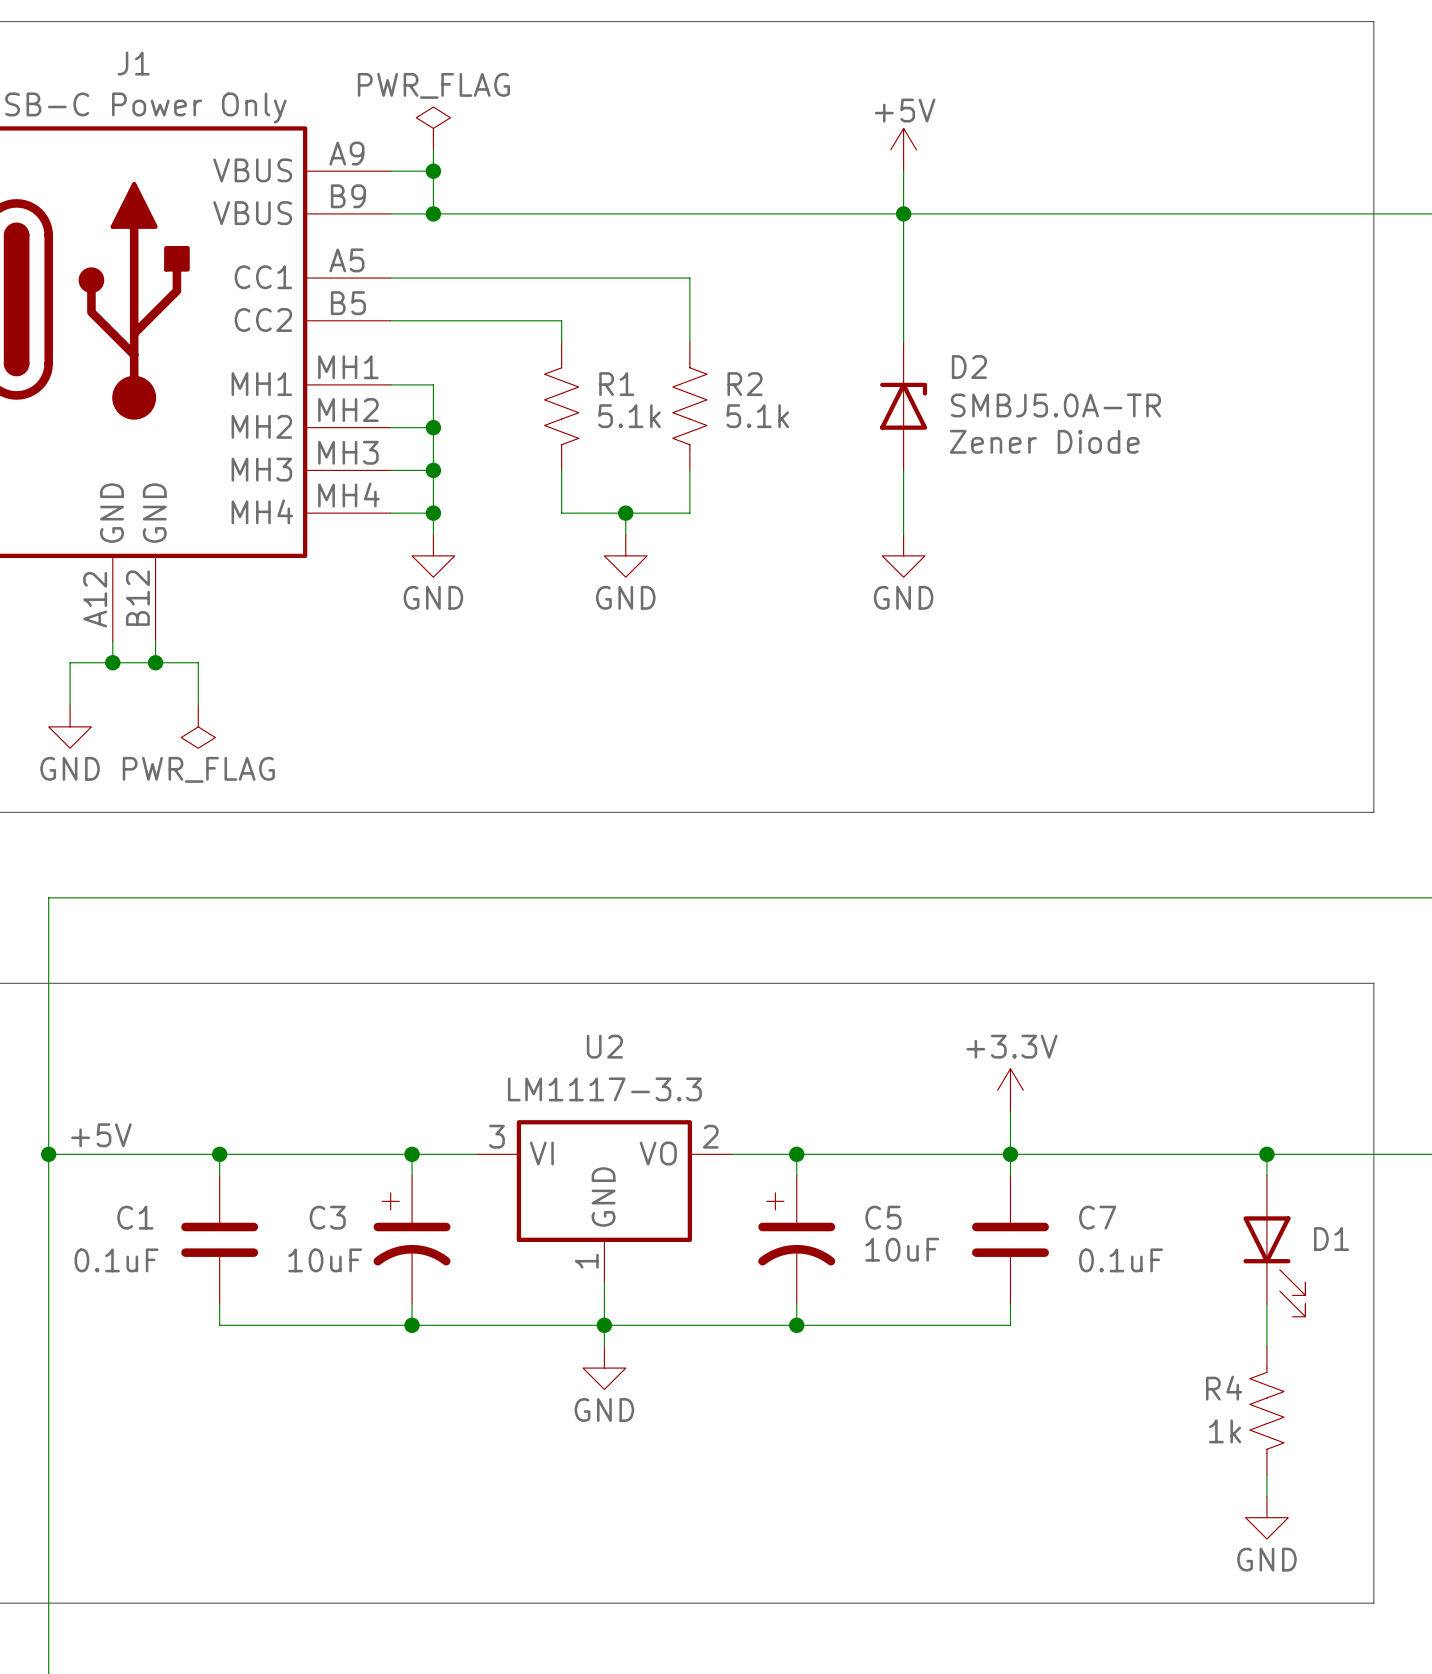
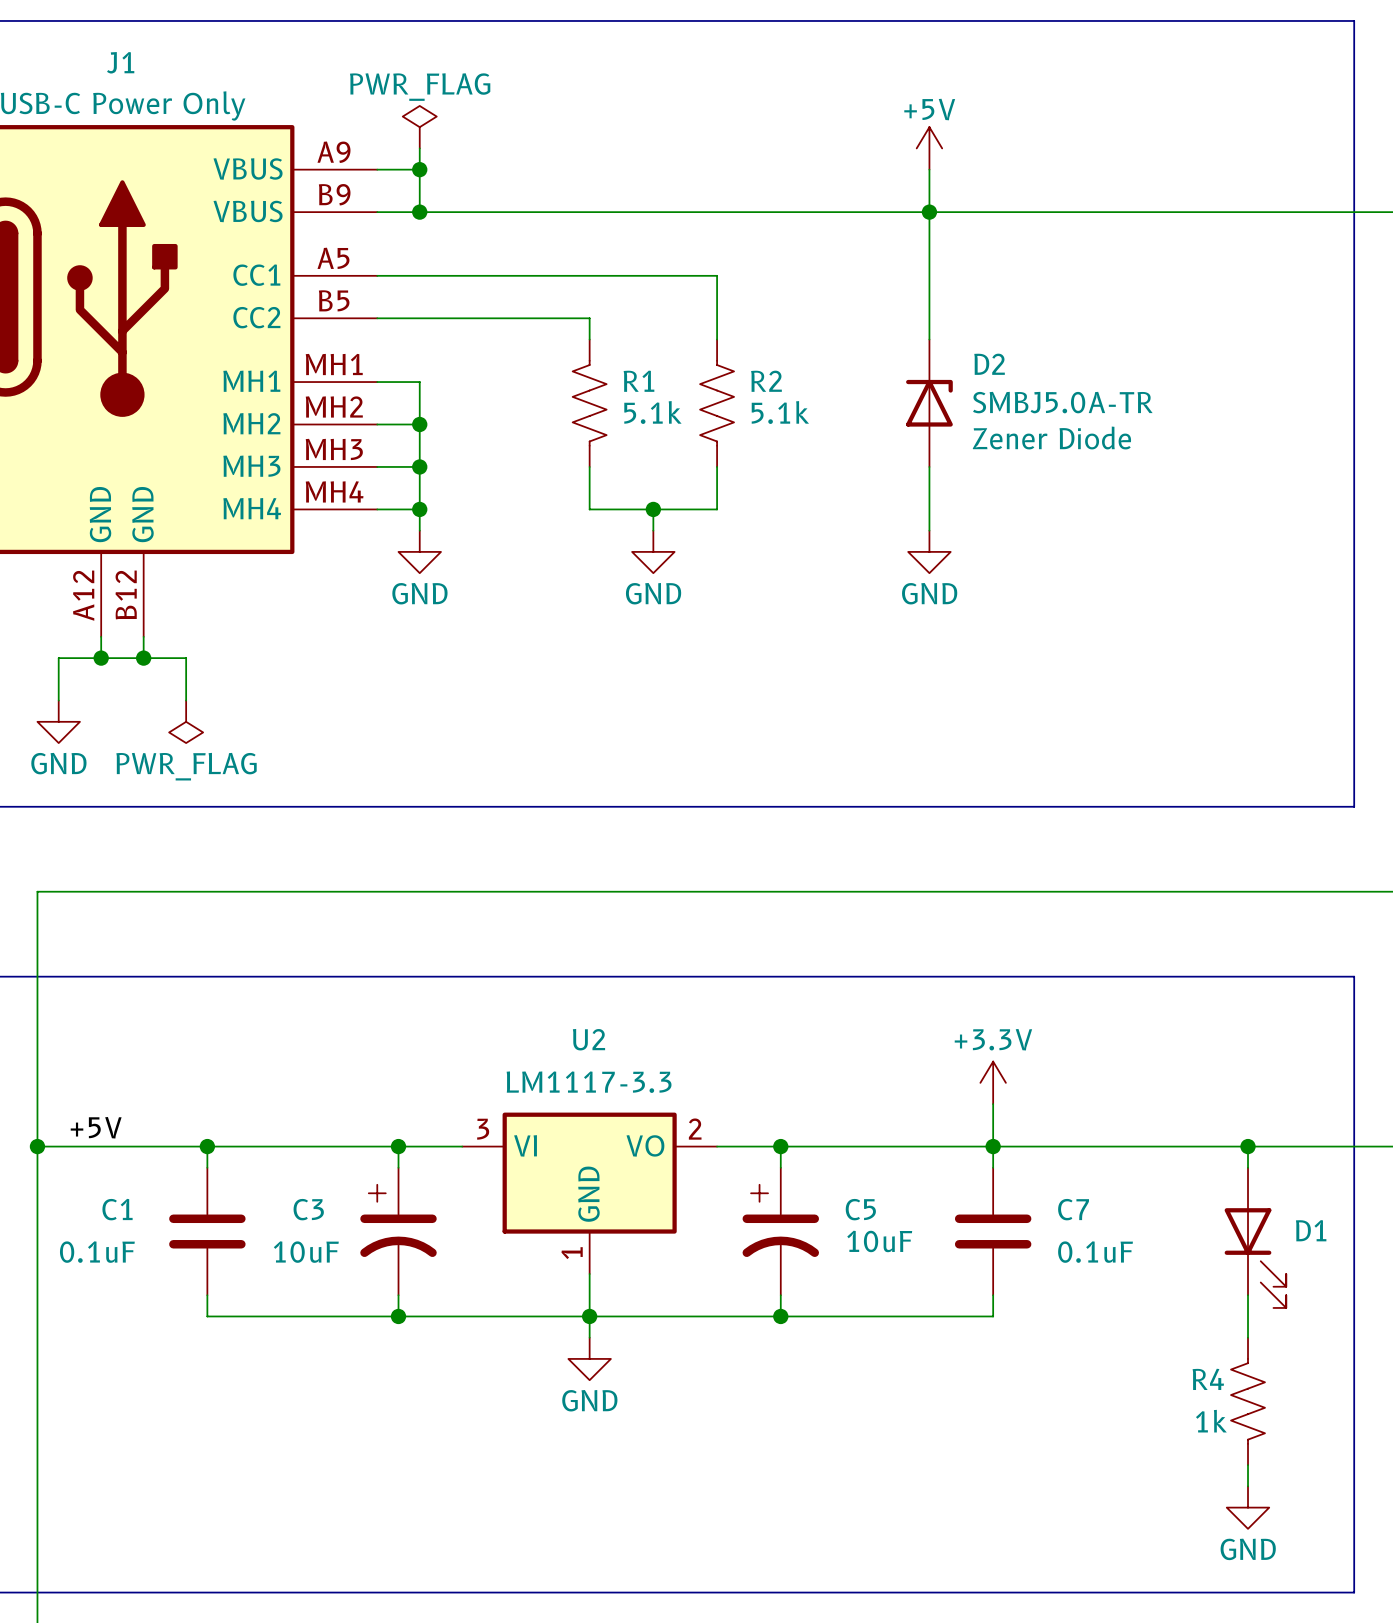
power symbol position: +5V (903, 149) -> +5V (929, 148)
wire: (903, 171) (903, 342) -> (929, 169) (929, 339)
junction position: (903, 213) -> (929, 212)
wire: (689, 278) (689, 342) -> (674, 275) (717, 275) (717, 339)
wire: (561, 320) (561, 342) -> (547, 318) (589, 318) (589, 339)
R1 position: (561, 406) -> (589, 403)
R2 position: (689, 406) -> (717, 403)
D2 position: (903, 406) -> (929, 403)
wire: (561, 470) (561, 513) (604, 513) -> (589, 466) (589, 509)
wire: (689, 470) (689, 513) -> (717, 466) (717, 509) (674, 509)
wire: (903, 470) (903, 534) -> (929, 466) (929, 530)
wire: (625, 513) (625, 534) -> (653, 509) (653, 530)
junction position: (625, 513) -> (653, 509)
power symbol position: GND (625, 555) -> GND (653, 551)
power symbol position: GND (903, 555) -> GND (929, 551)

